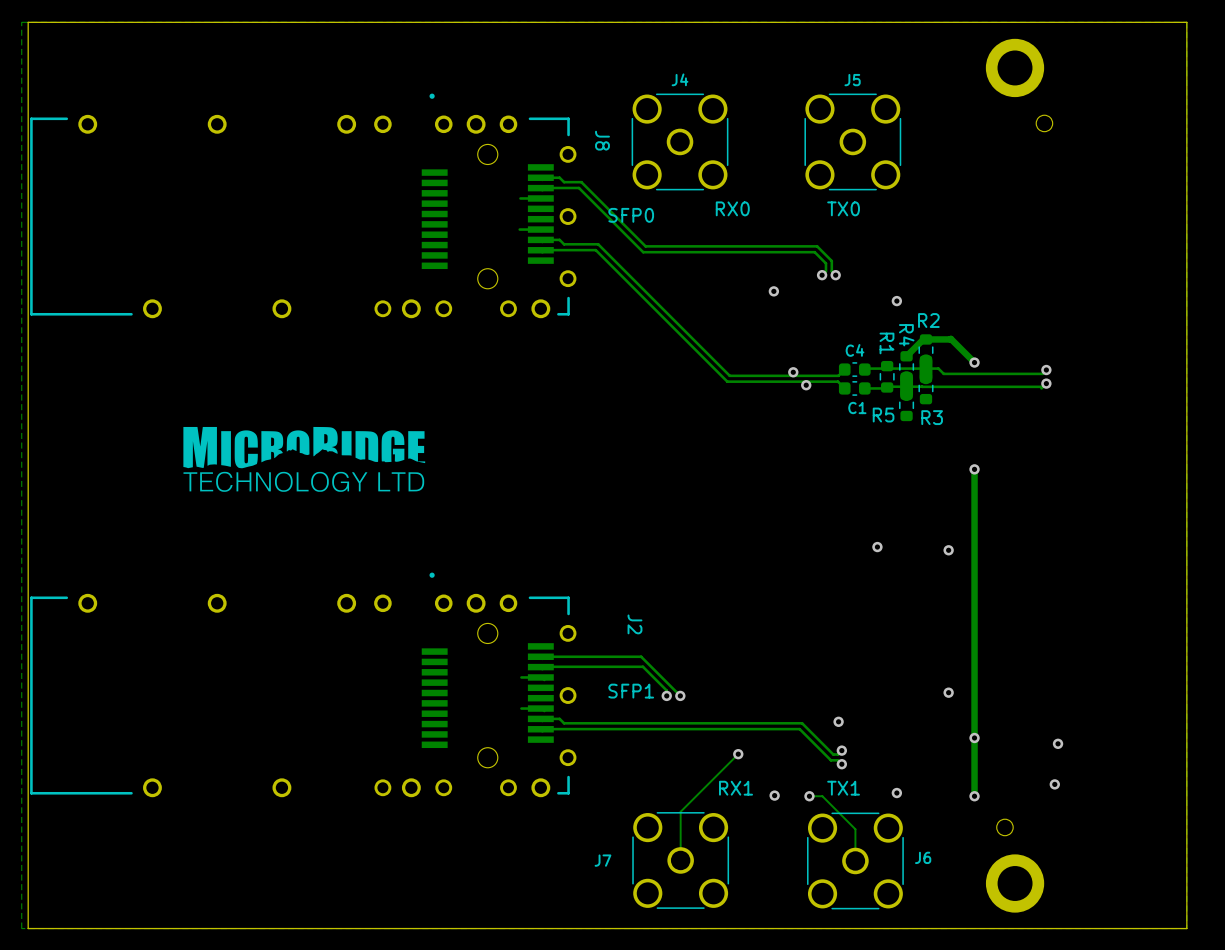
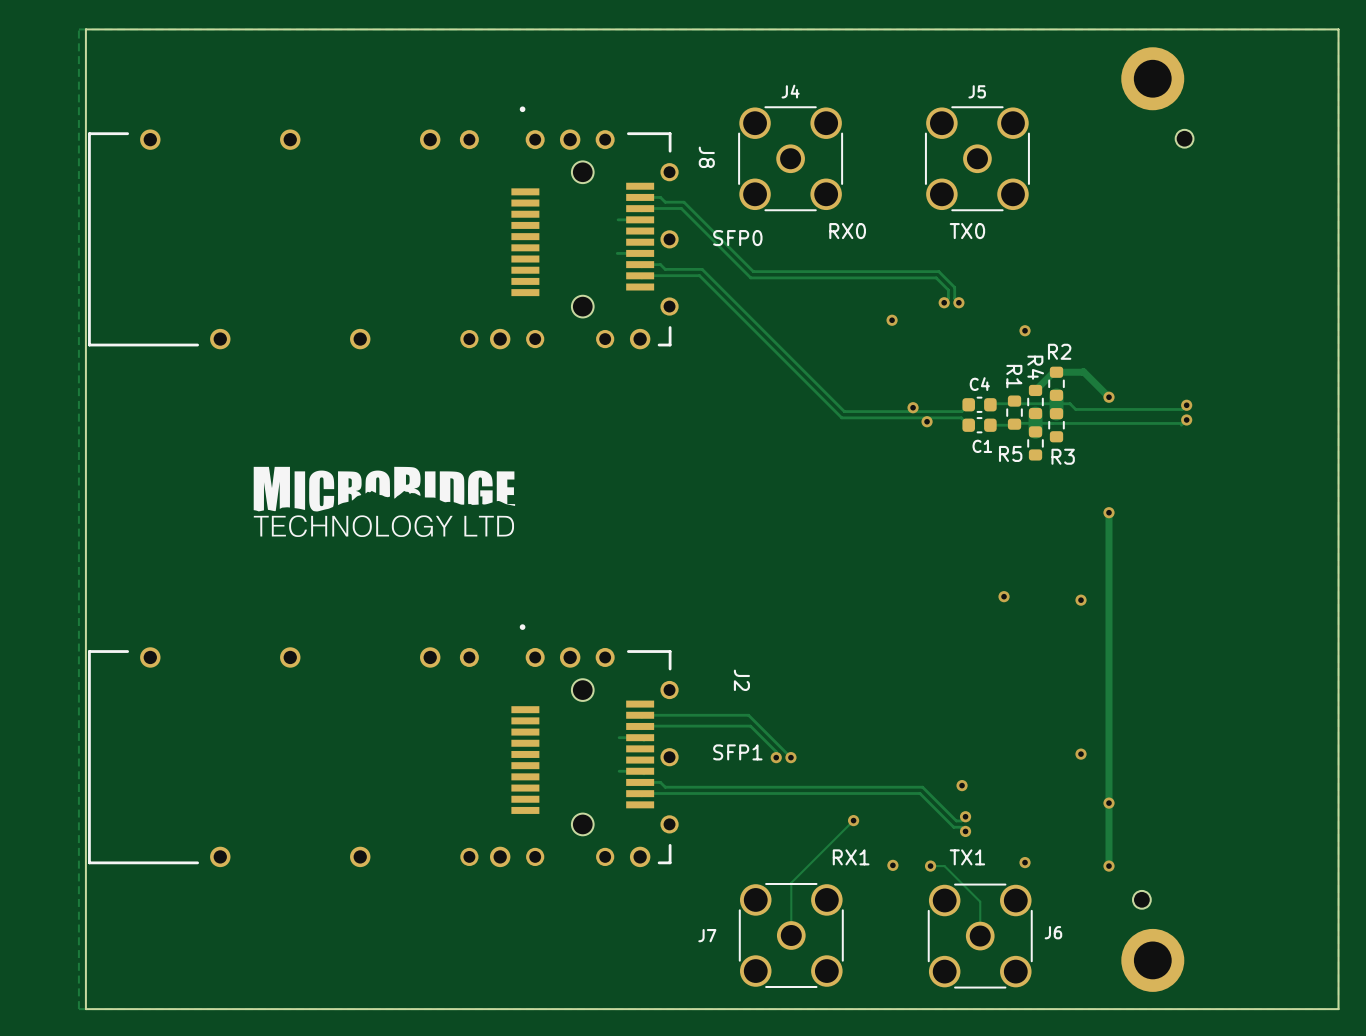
via: (1058, 743) -> none
via: (1054, 784) -> none

